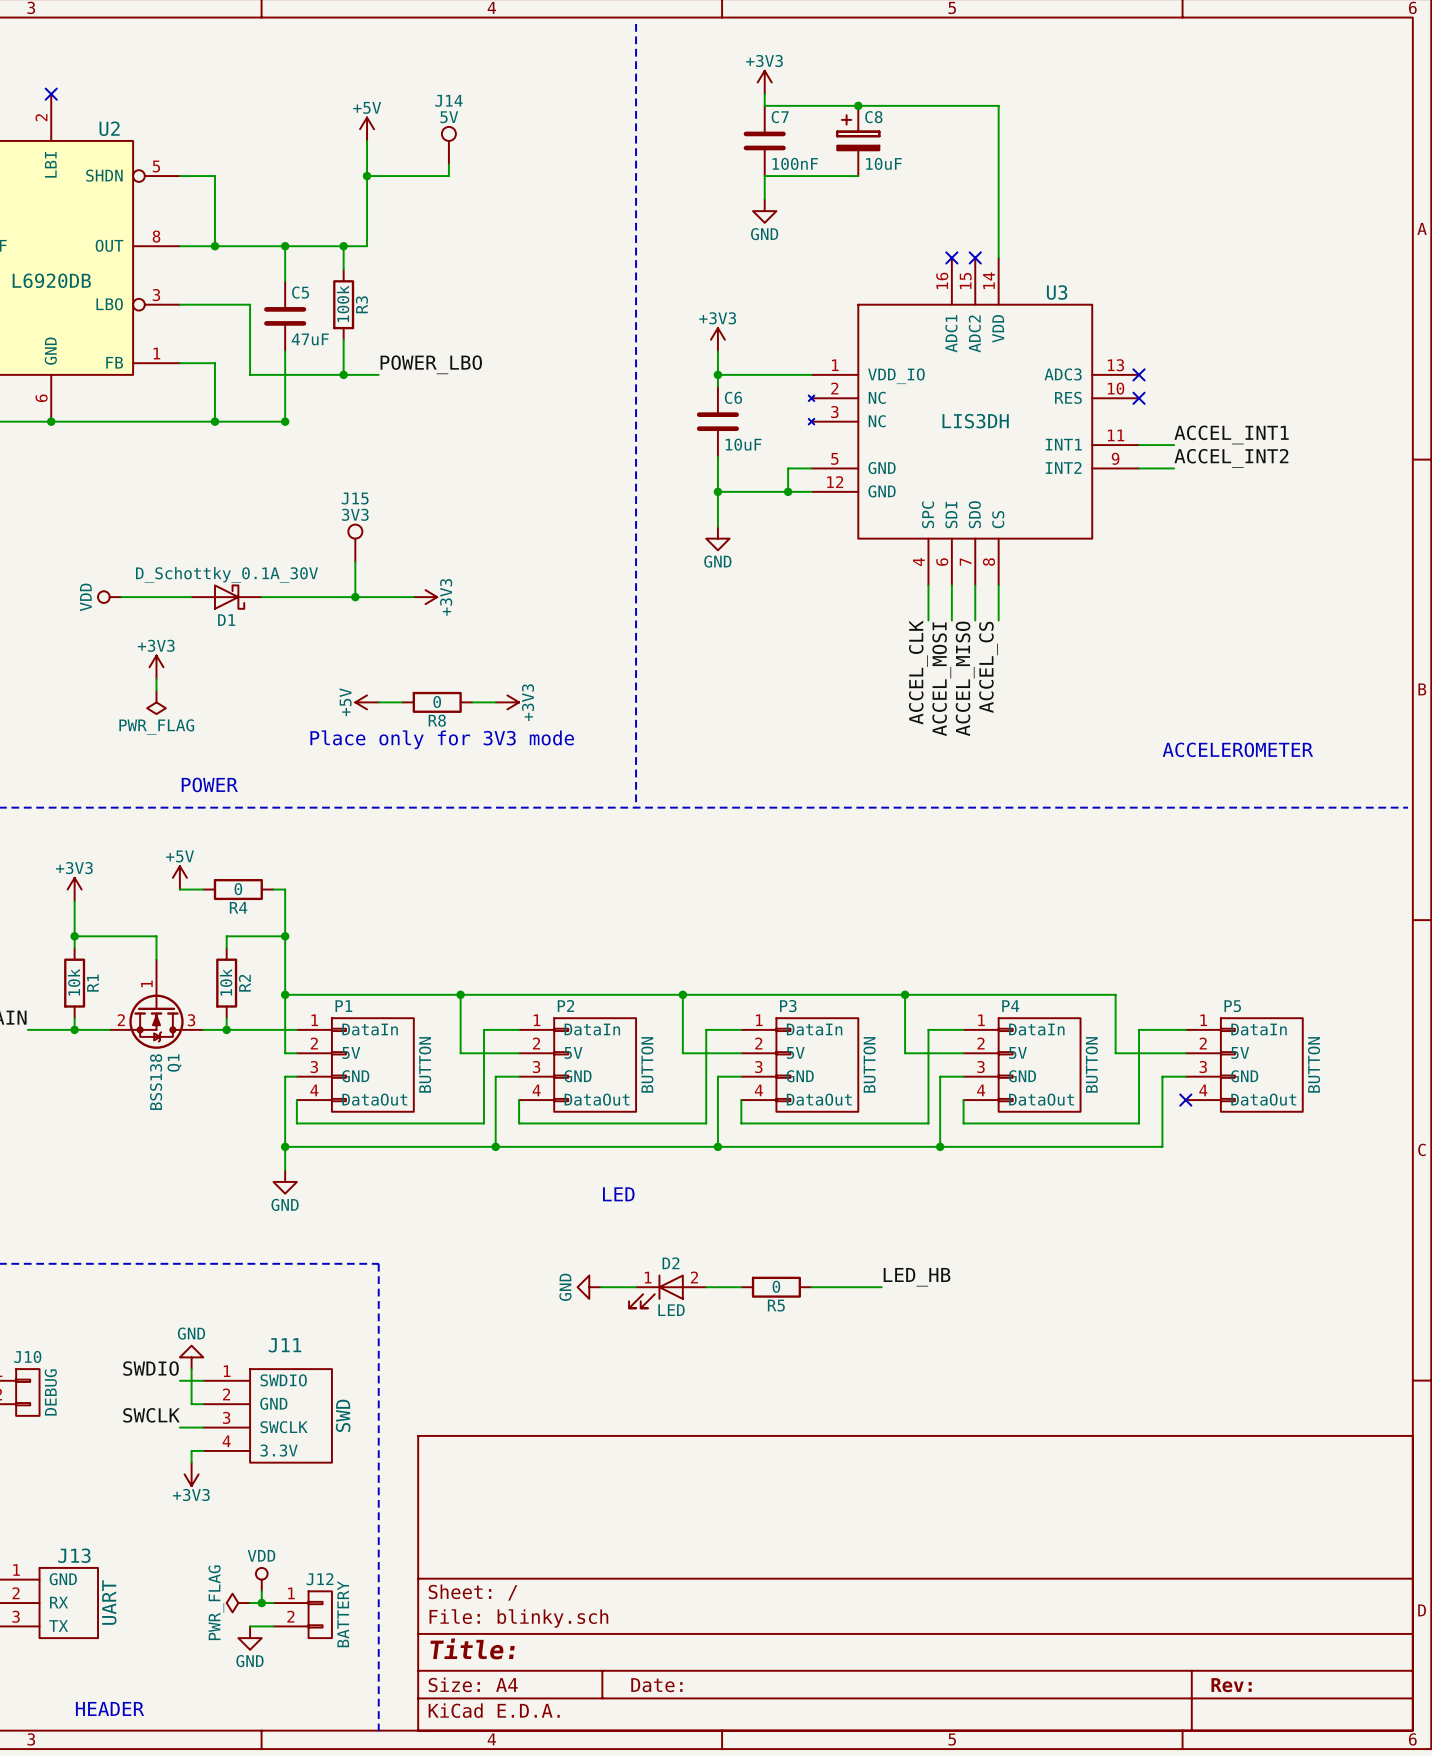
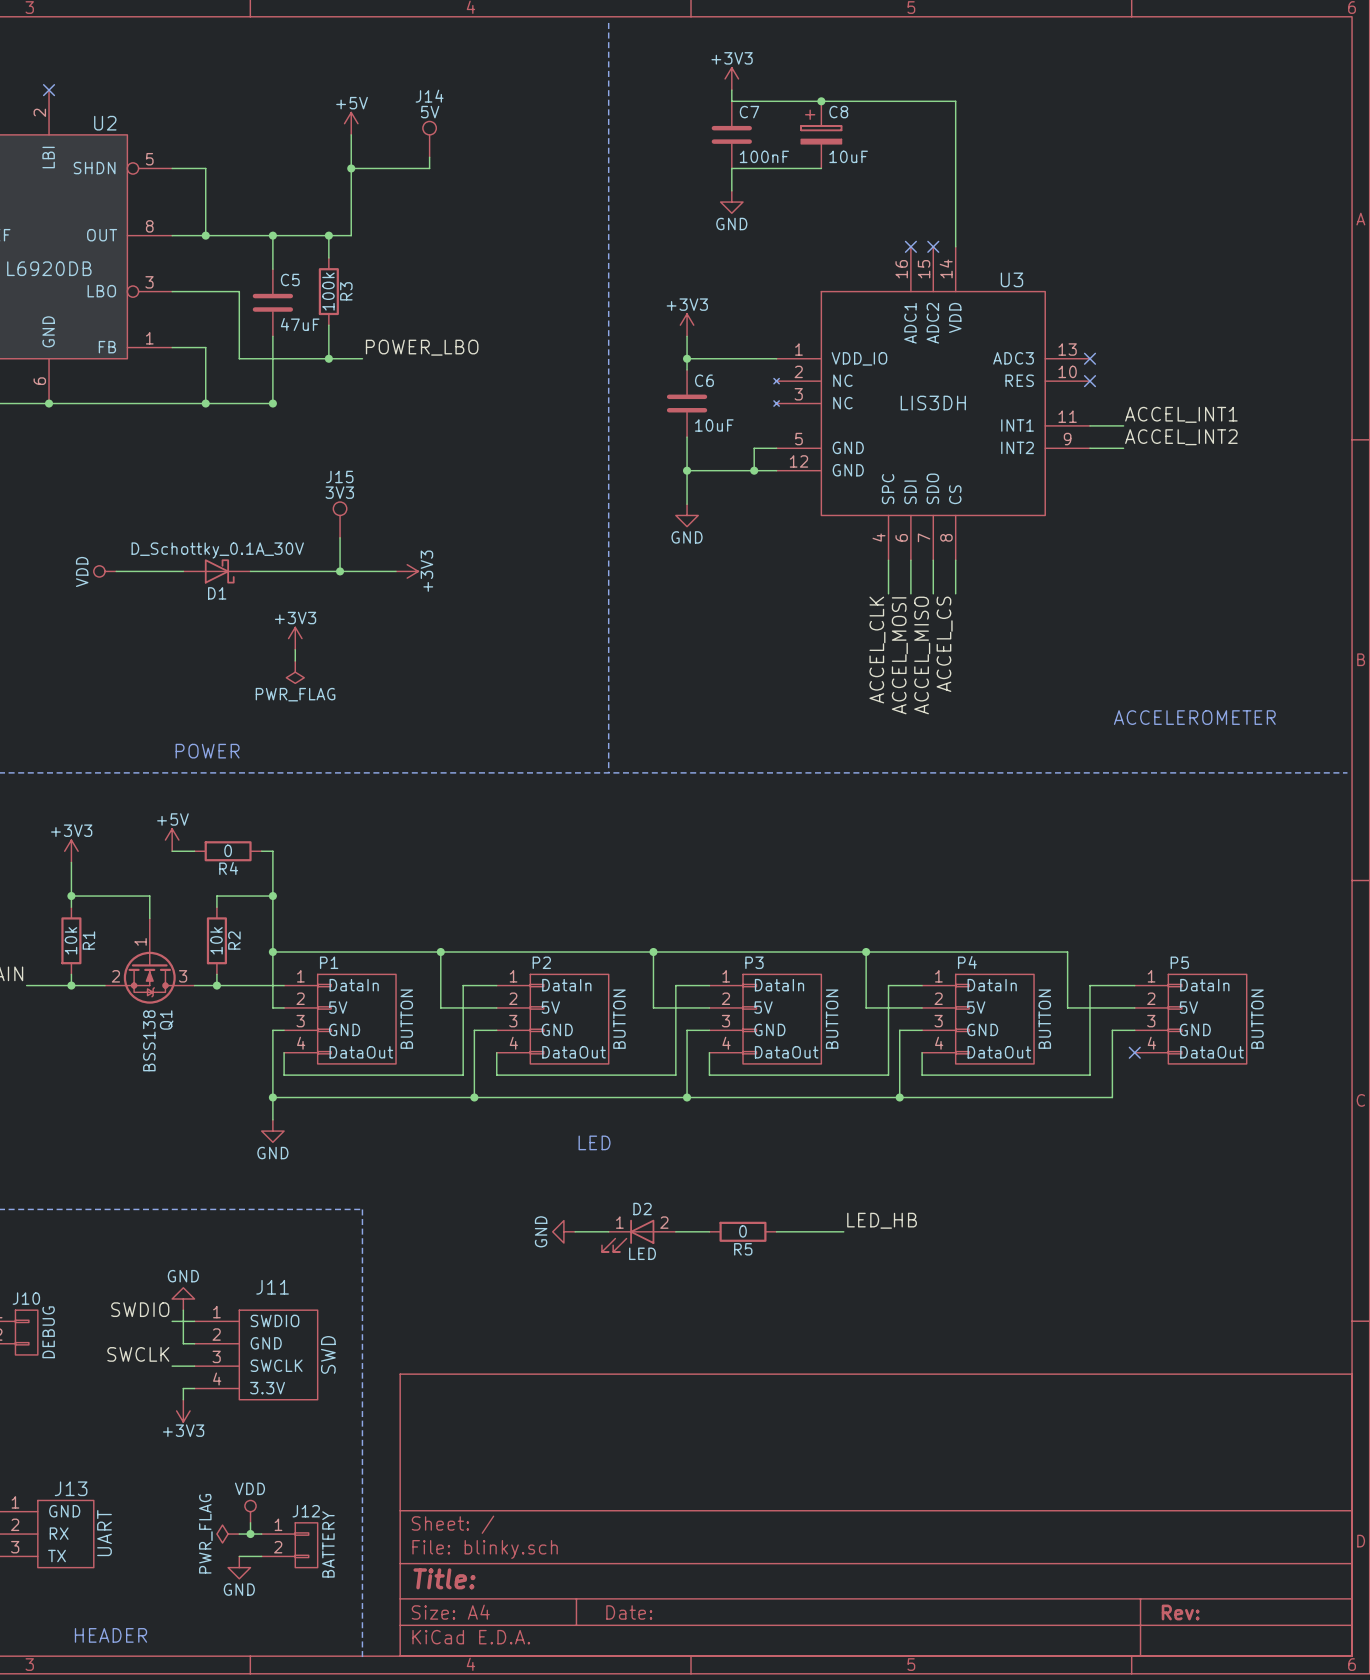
power symbol: +3V3 (156, 667) -> none
power symbol: none -> +3V3 (295, 638)
wire: (156, 679) (156, 690) -> (295, 649) (295, 660)
power symbol position: PWR_FLAG (156, 702) -> PWR_FLAG (295, 672)
power symbol: +5V (367, 702) -> none
wire: (378, 702) (402, 702) -> none
R8: 0 (437, 702) -> none
wire: (472, 702) (495, 702) -> none
power symbol: +3V3 (507, 702) -> none
text: Place only for 3V3 mode (442, 739) -> none

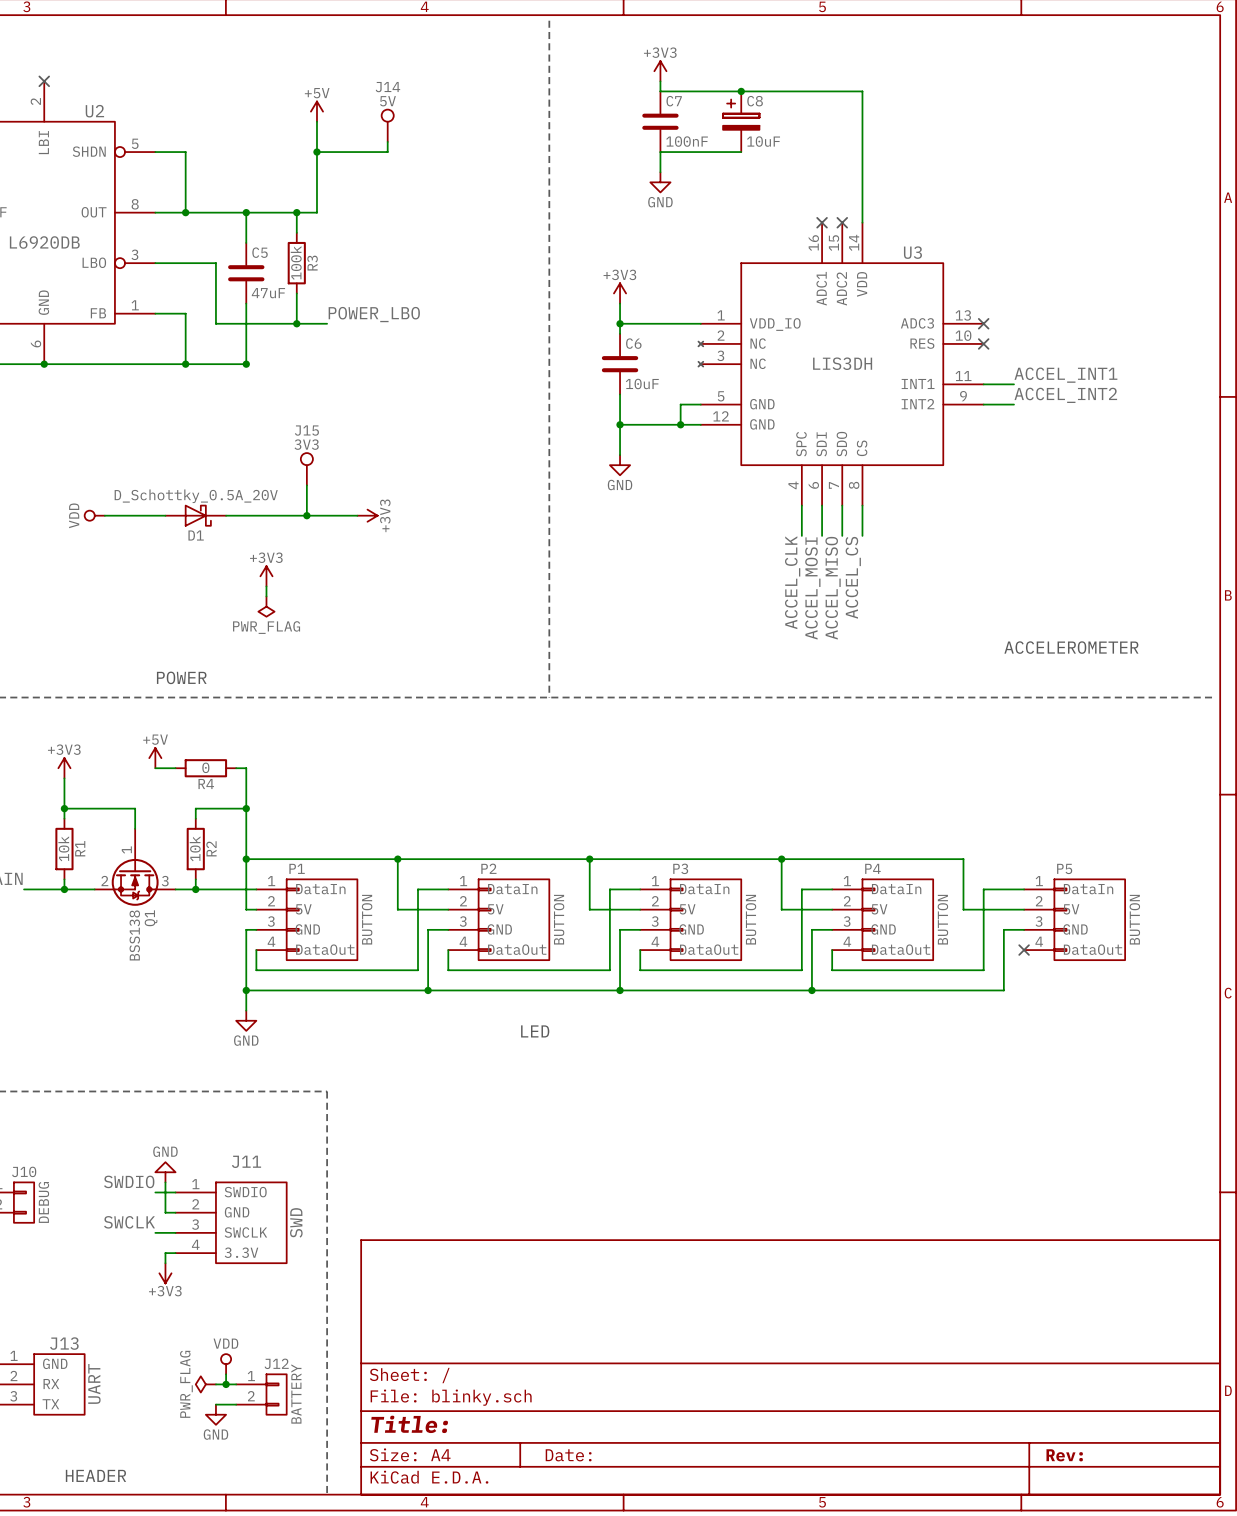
D1 value: D_Schottky_0.1A_30V (217, 550) -> D_Schottky_0.5A_20V (196, 496)
label: LED_HB (882, 1220) -> none
power symbol: GND (563, 1231) -> none
wire: (575, 1231) (608, 1231) -> none
wire: (675, 1231) (709, 1231) -> none
R5: 0 (743, 1231) -> none
wire: (776, 1231) (843, 1231) -> none
D2: LED (638, 1235) -> none

